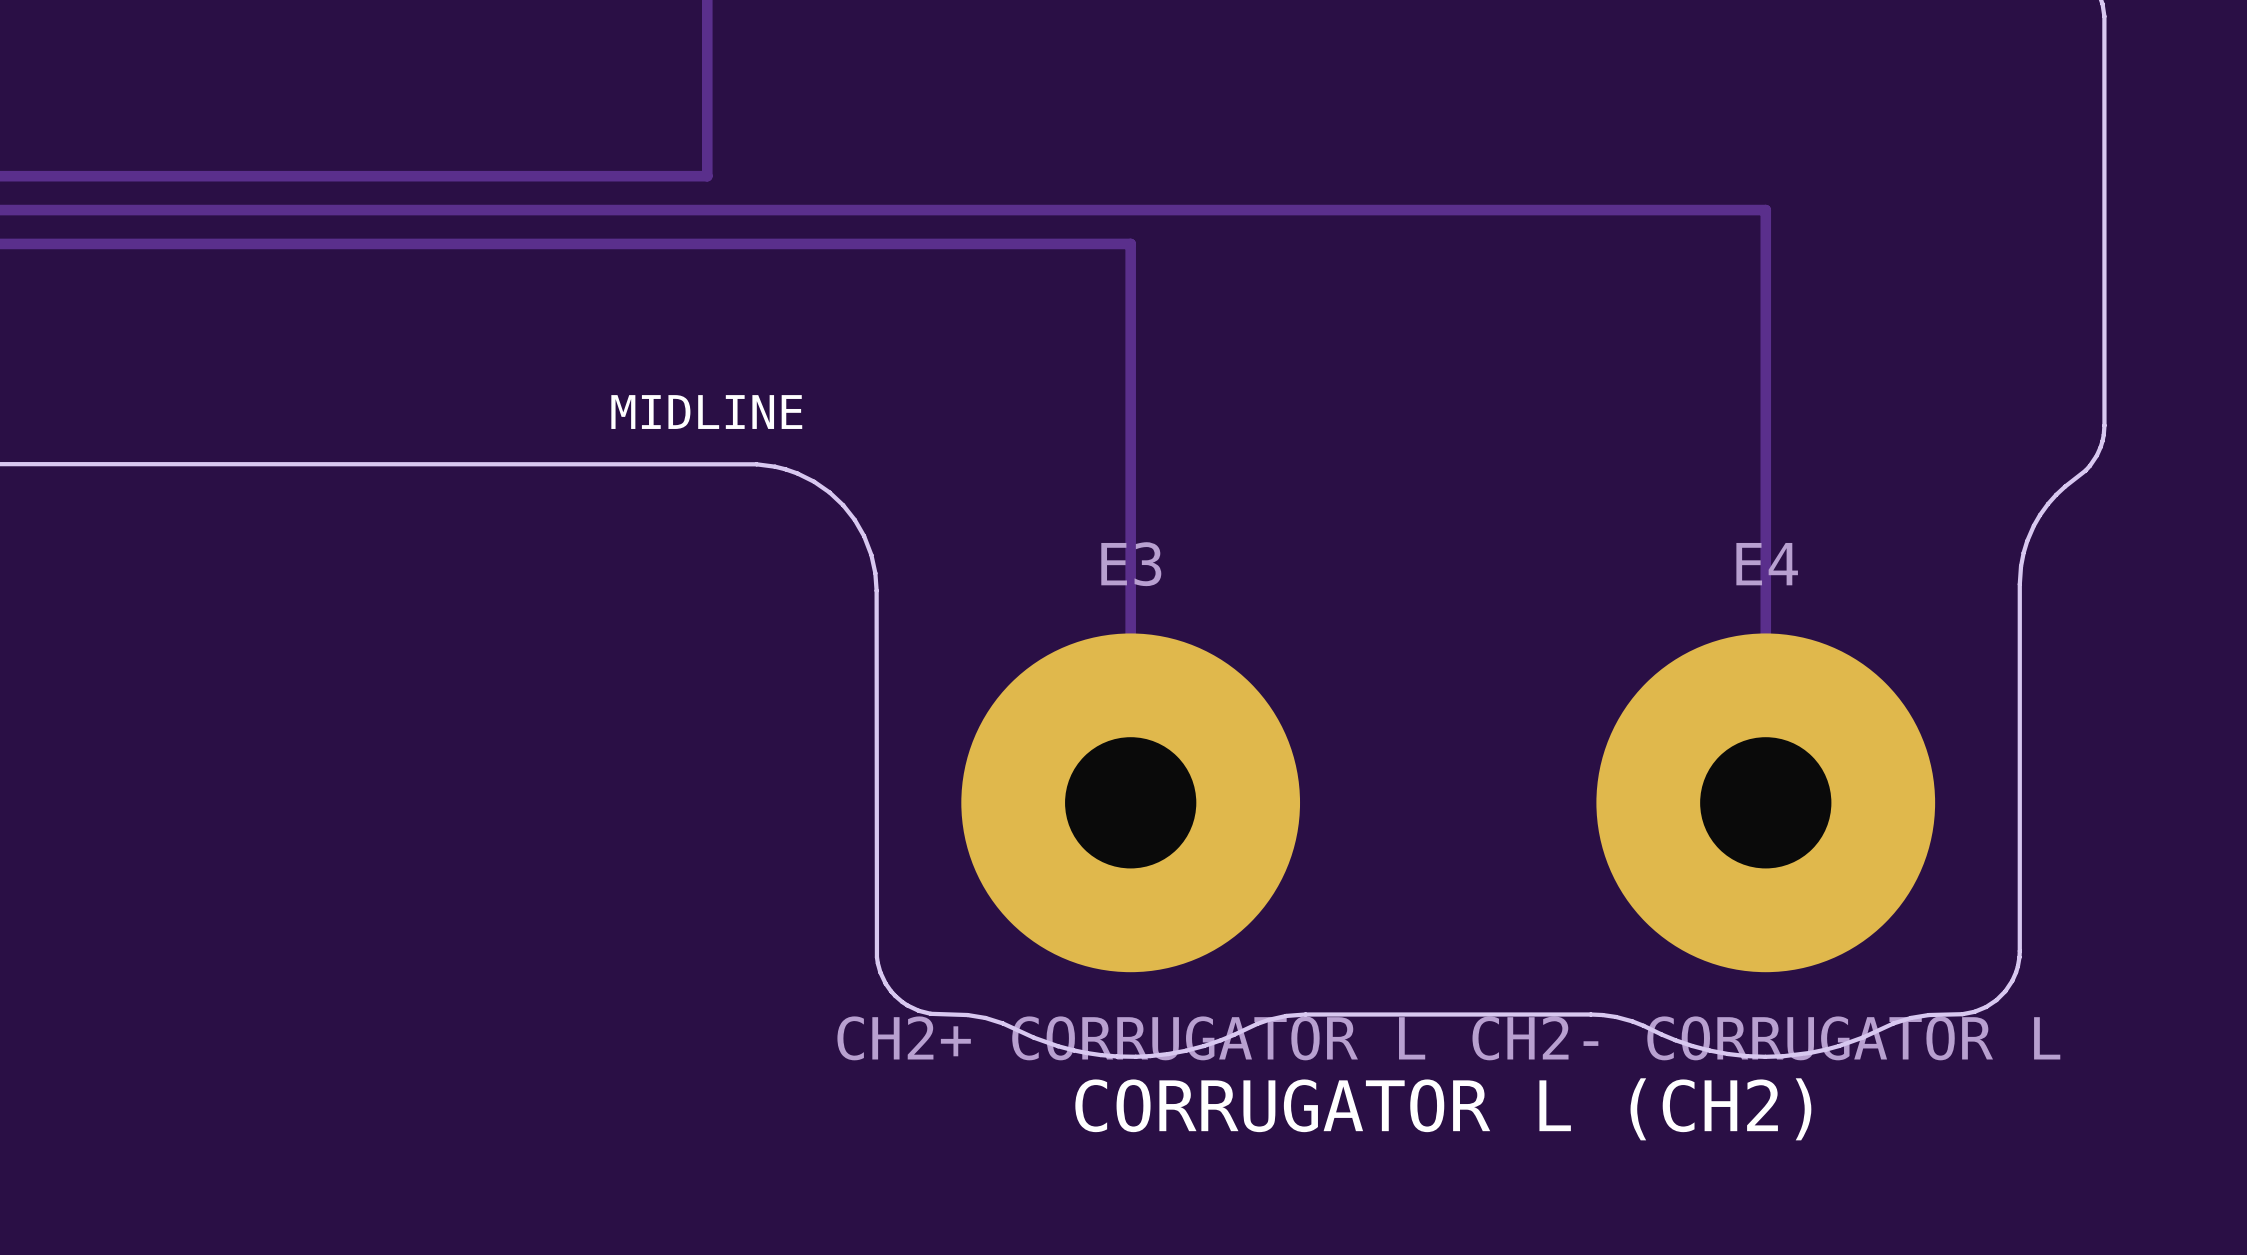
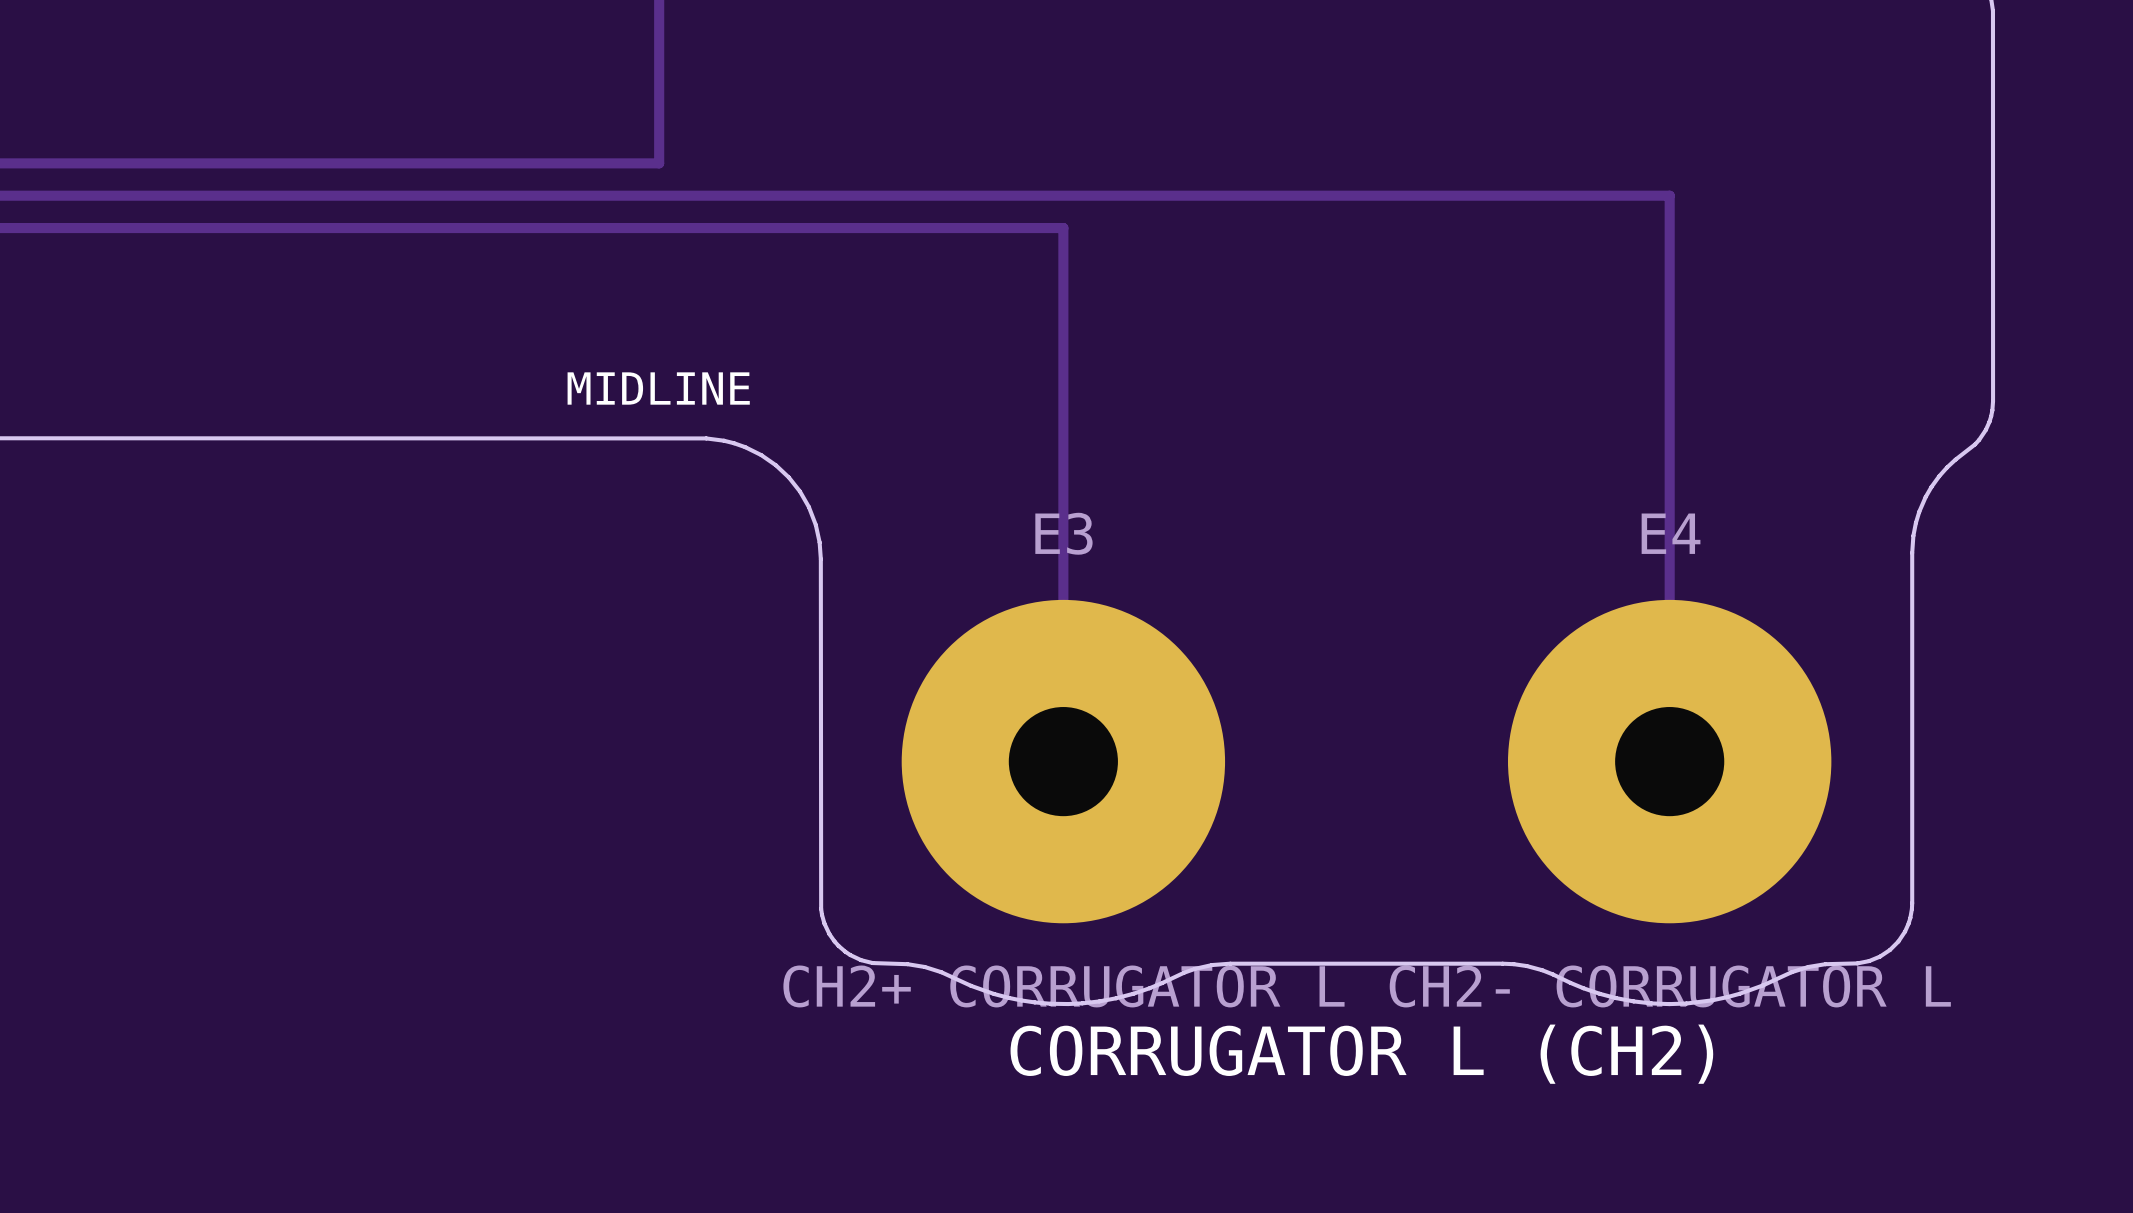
E3 footprint: [961, 633, 1301, 973] -> [901, 599, 1226, 924]
E4 footprint: [1596, 633, 1936, 973] -> [1508, 599, 1832, 924]

